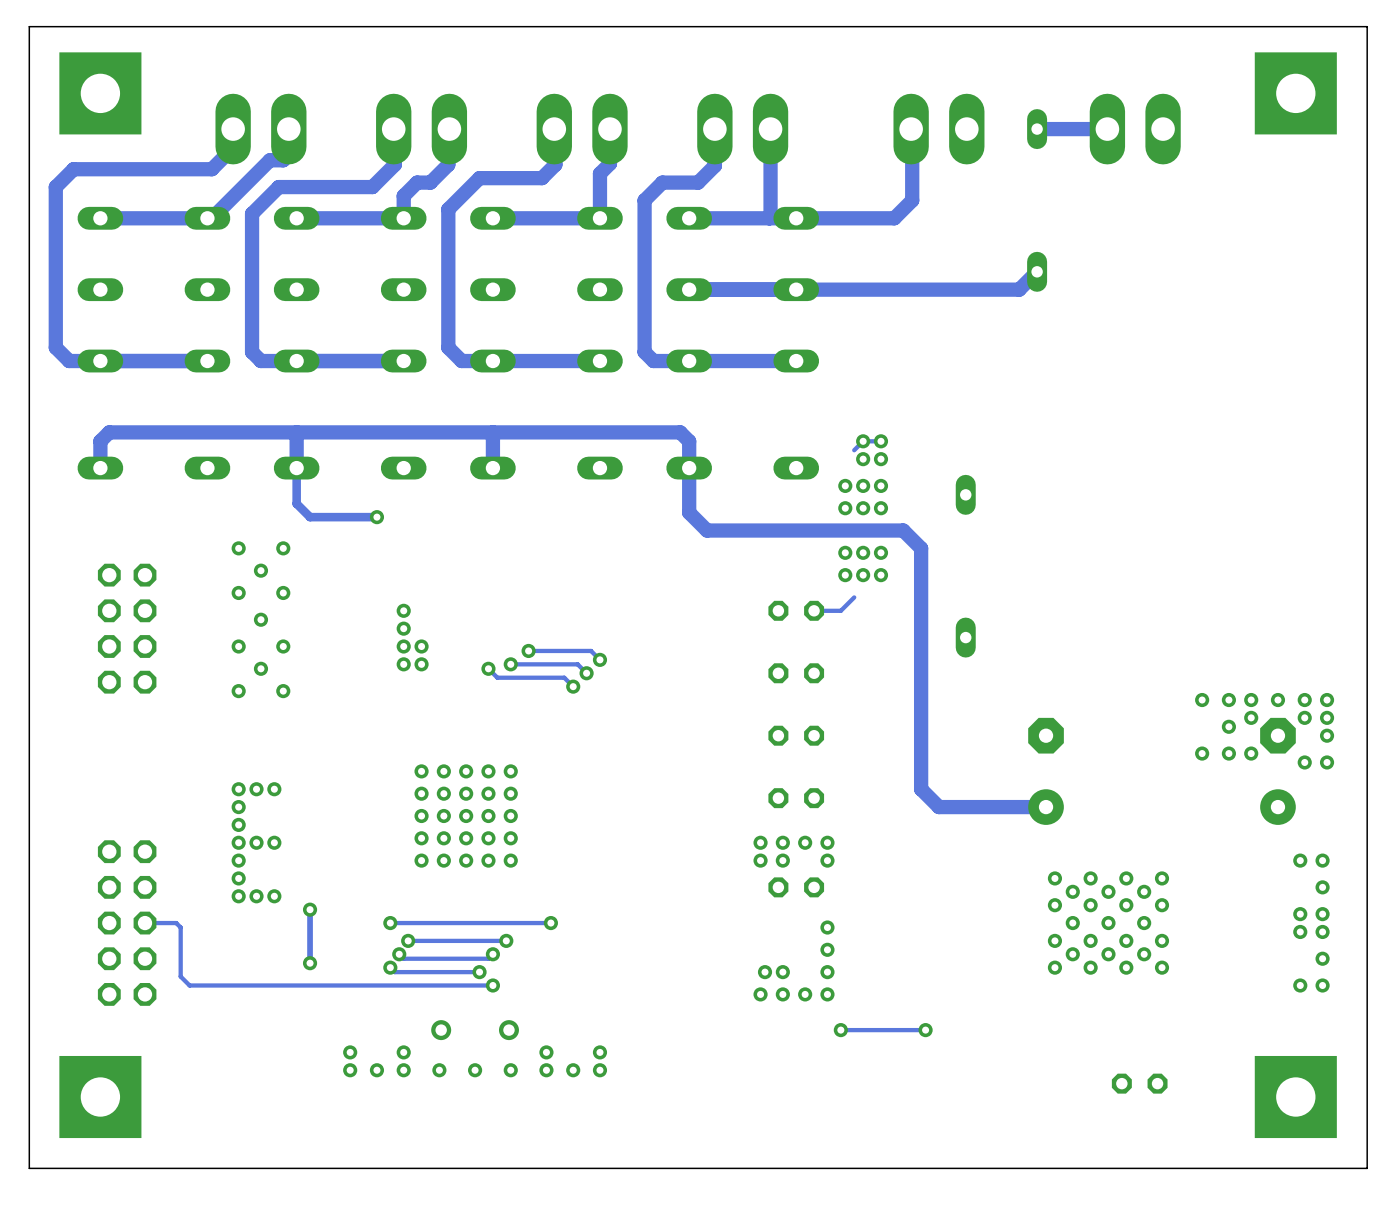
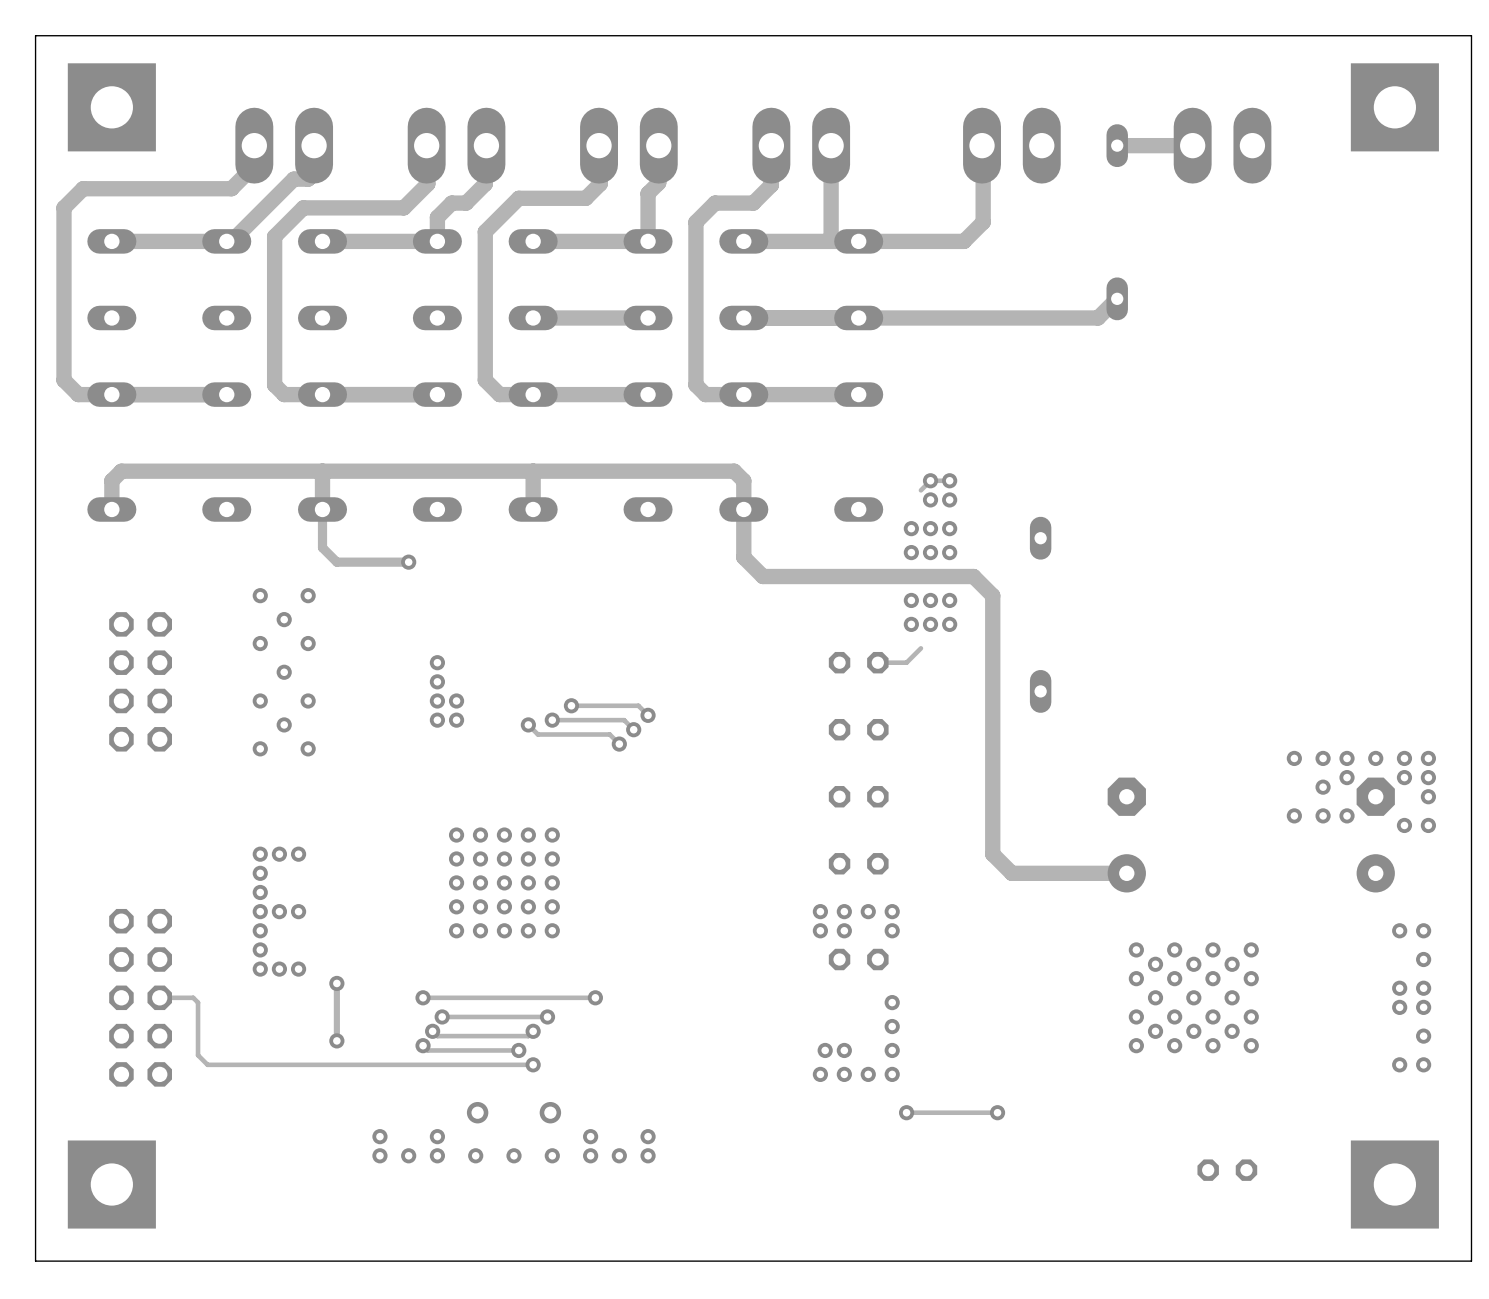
track: none -> (648, 317) (533, 317)

